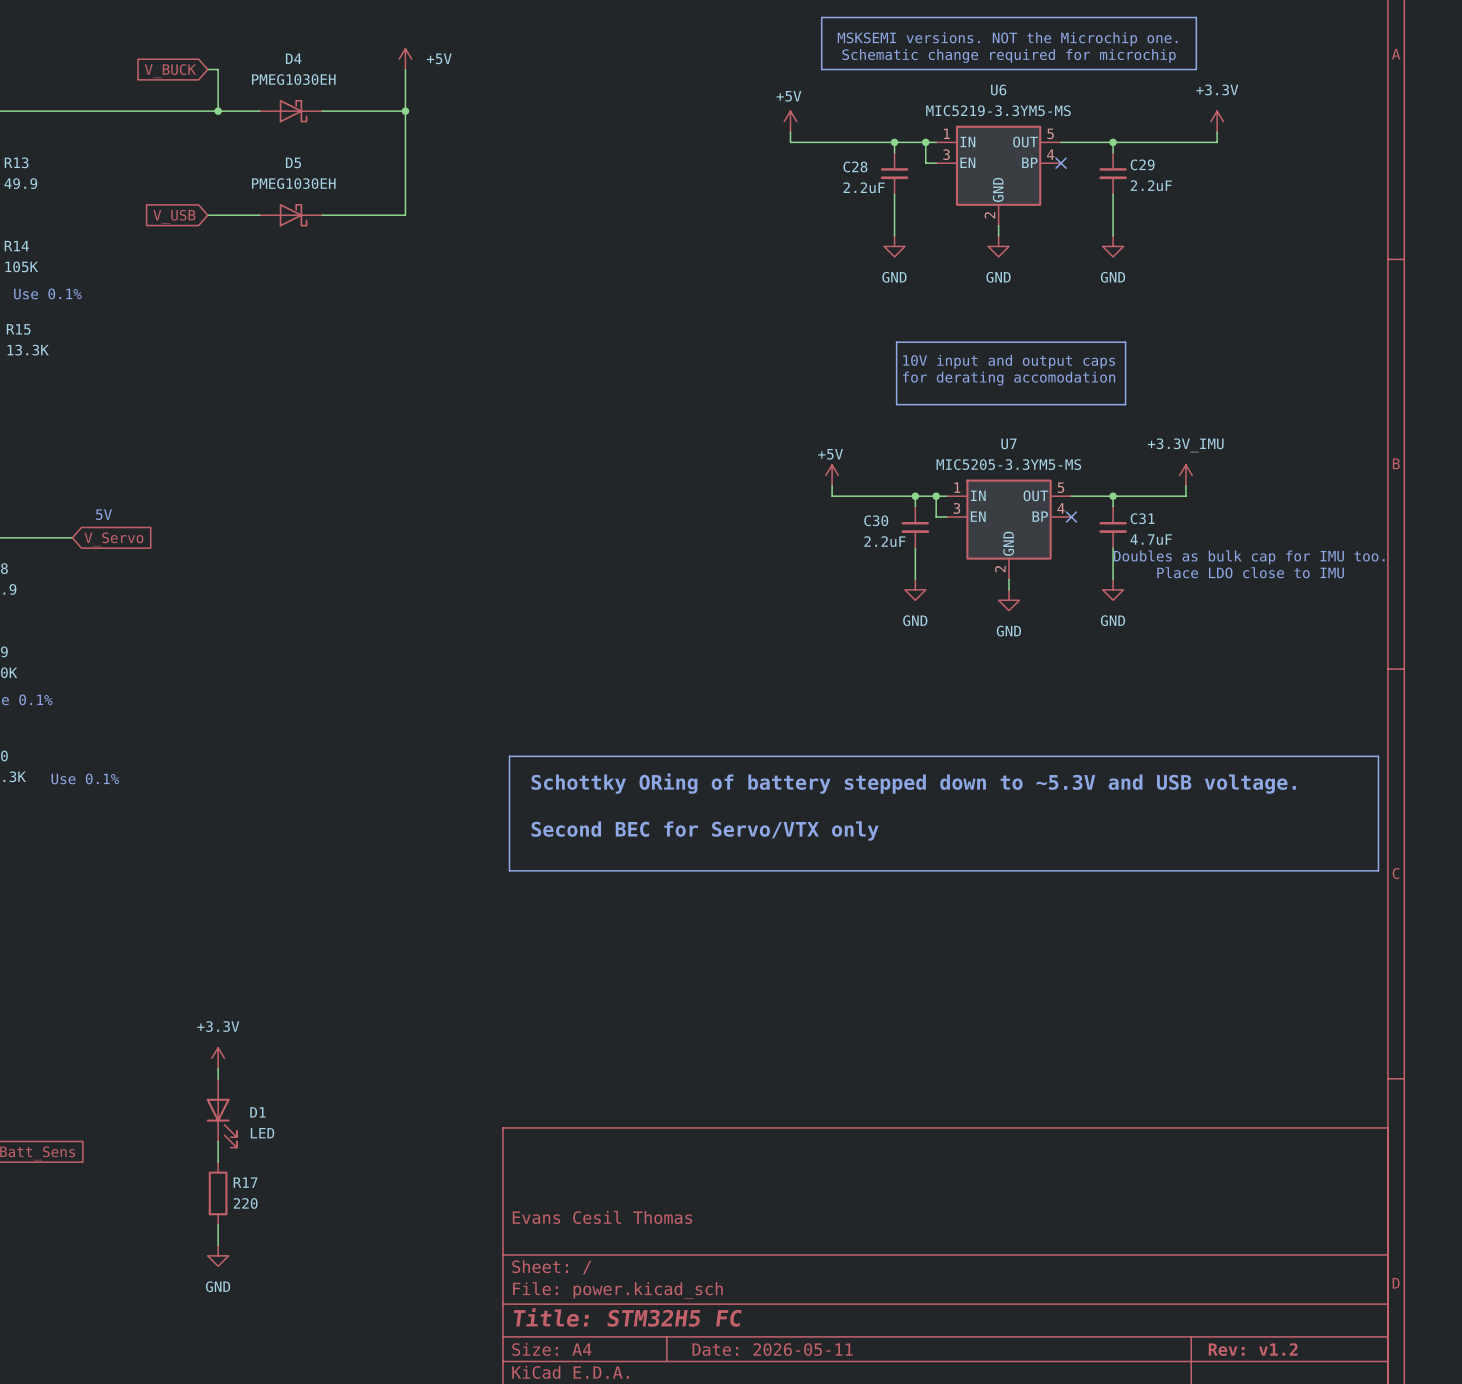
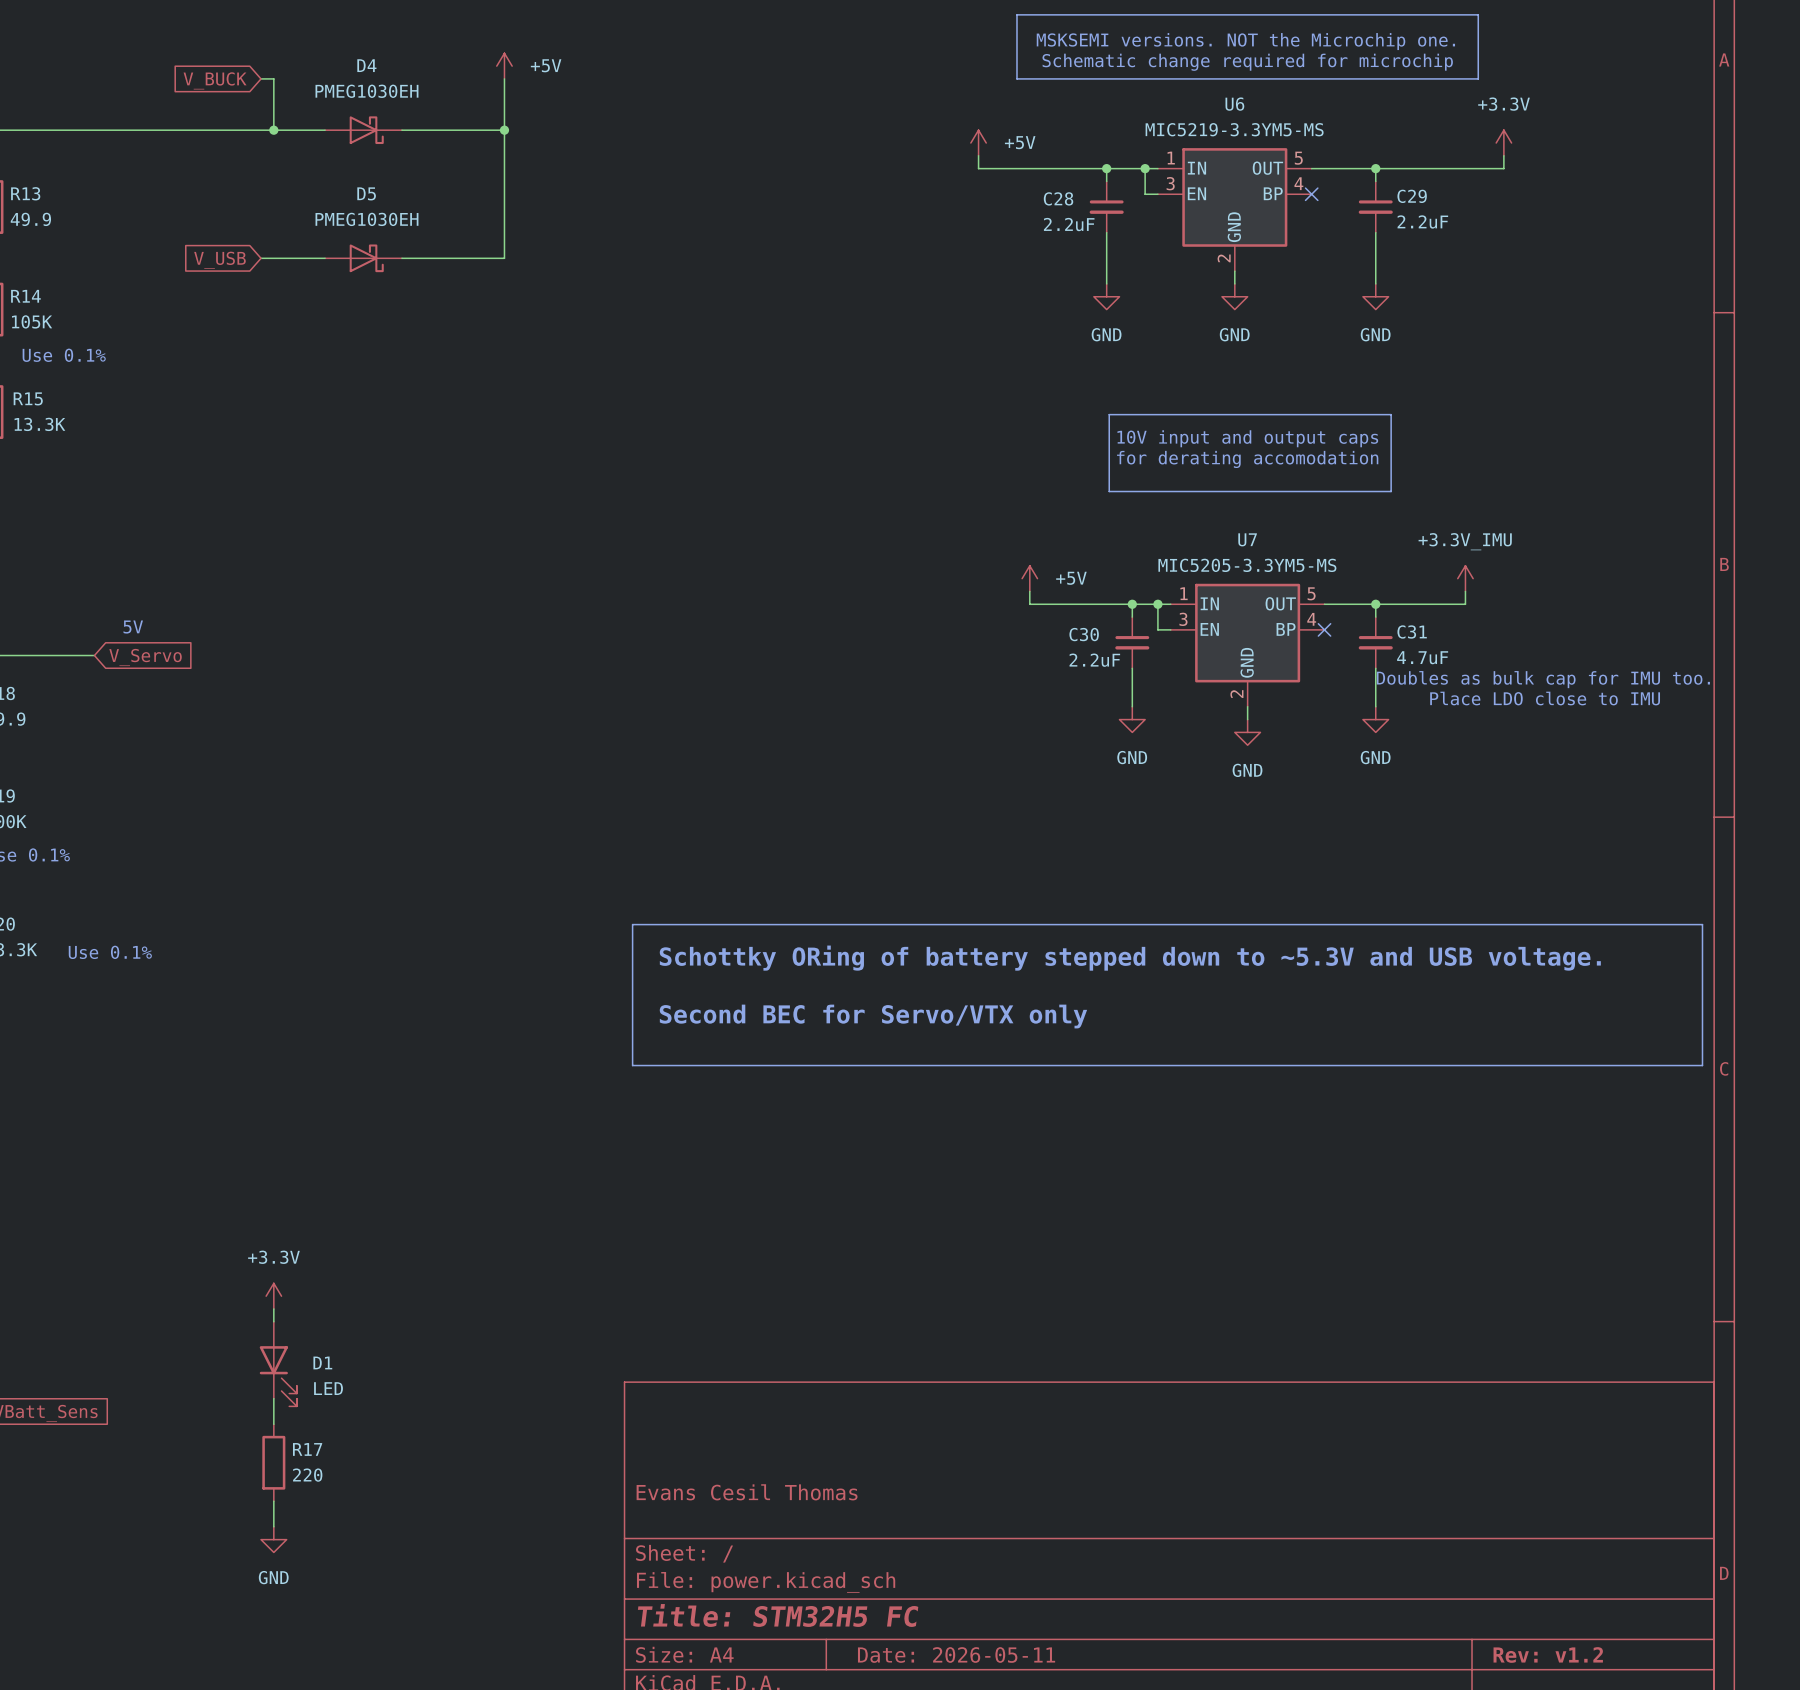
power symbol text position: +5V (788, 96) -> +5V (1020, 142)
power symbol text position: +5V (830, 454) -> +5V (1071, 578)

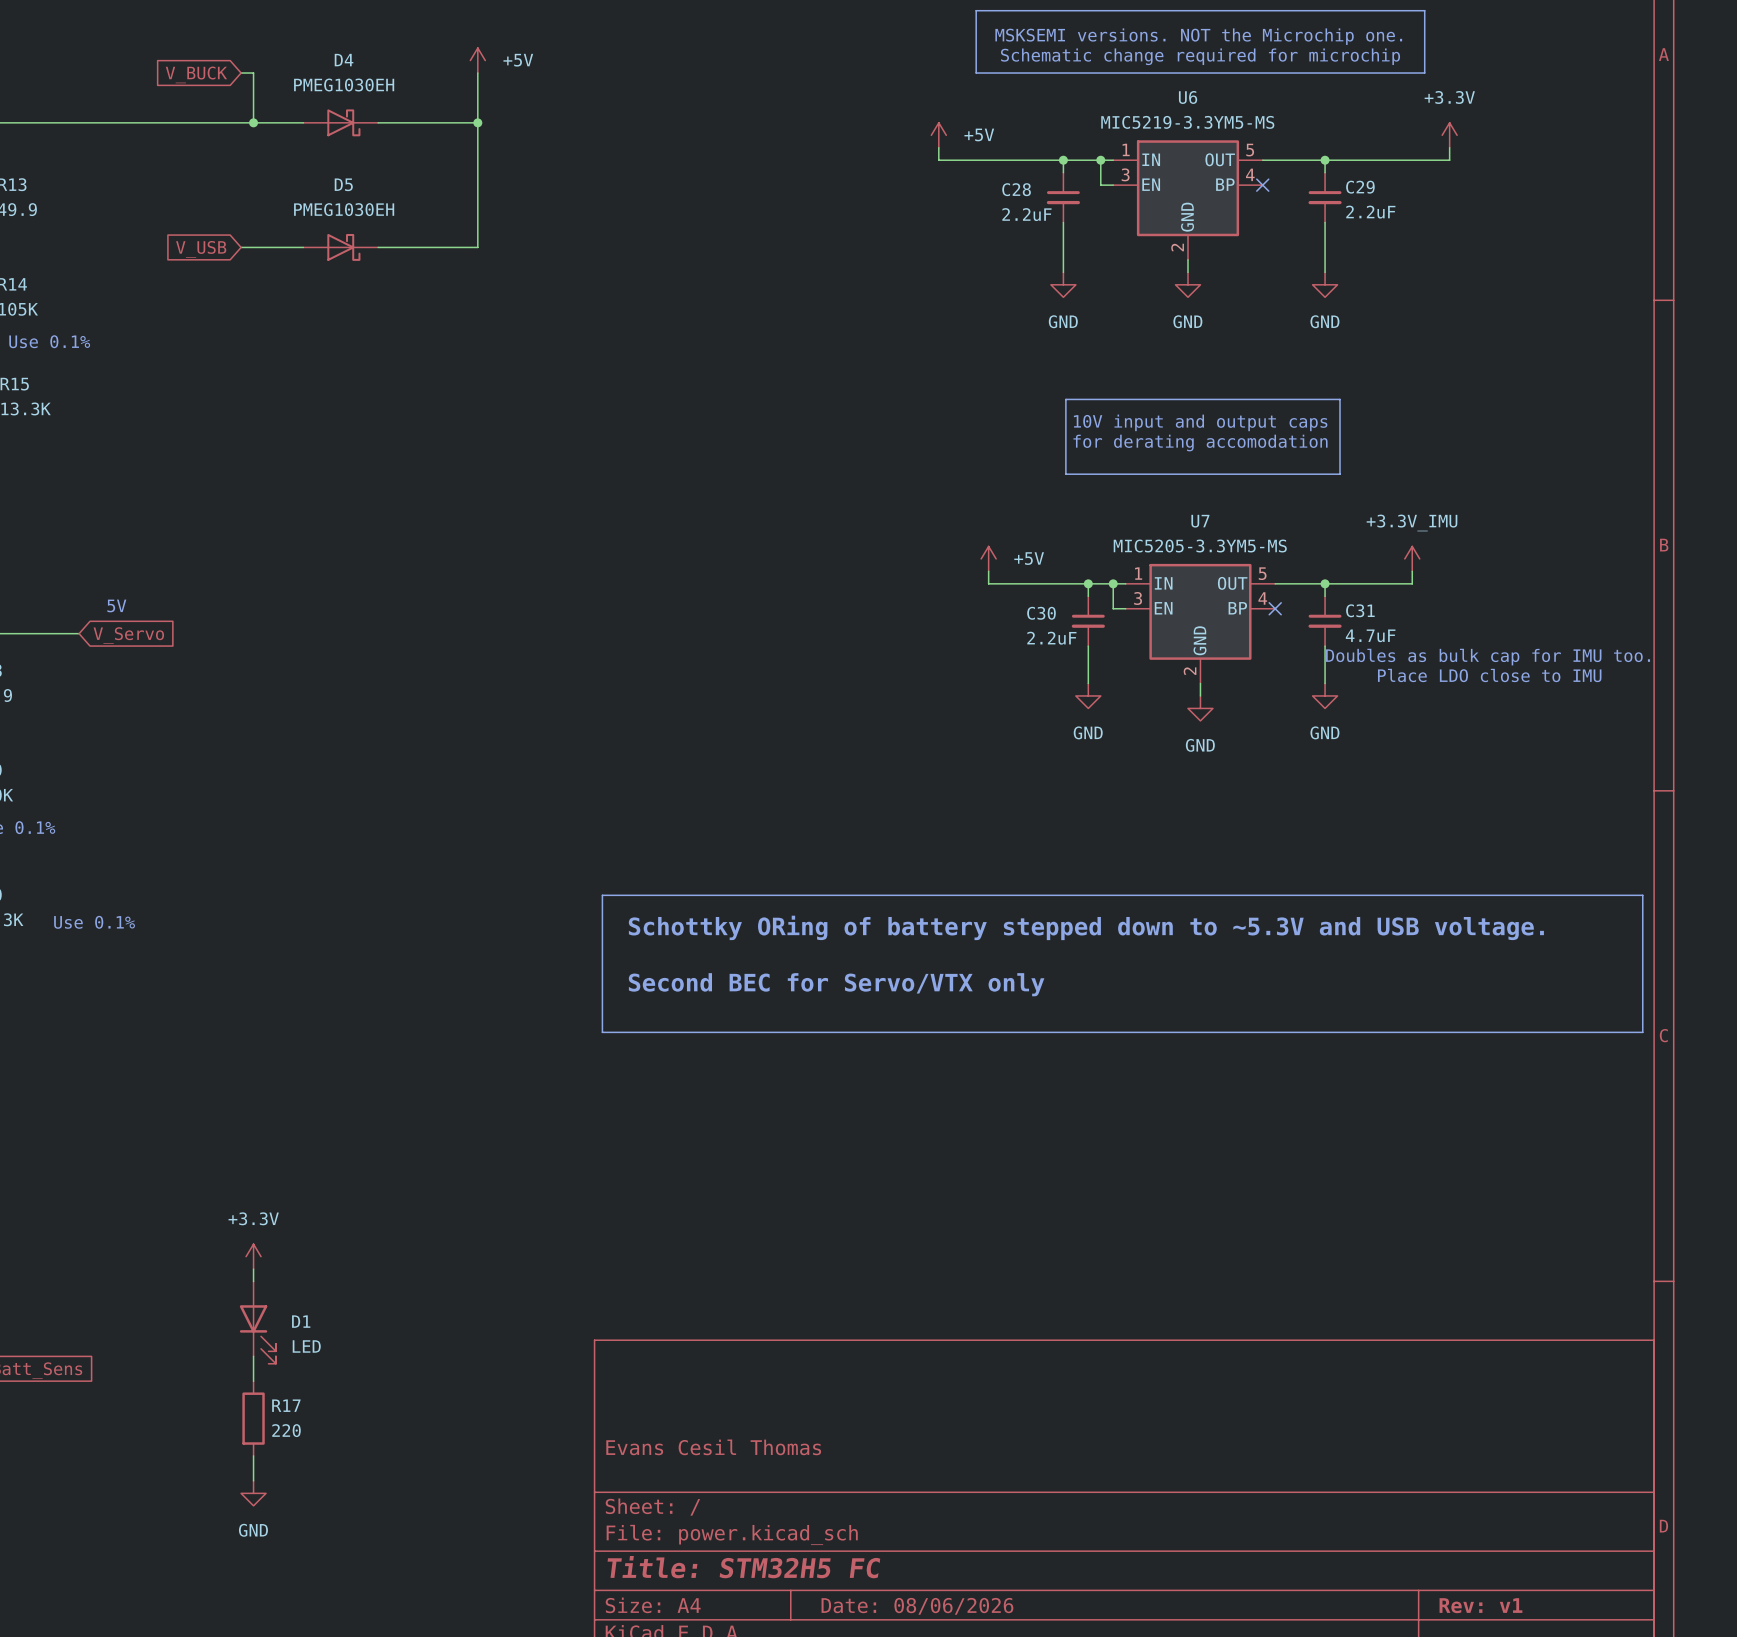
title block: Date: 2026-05-11 (956, 1654) -> Date: 08/06/2026 (917, 1606)
title block: Rev: v1.2 (1548, 1654) -> Rev: v1 (1480, 1605)

